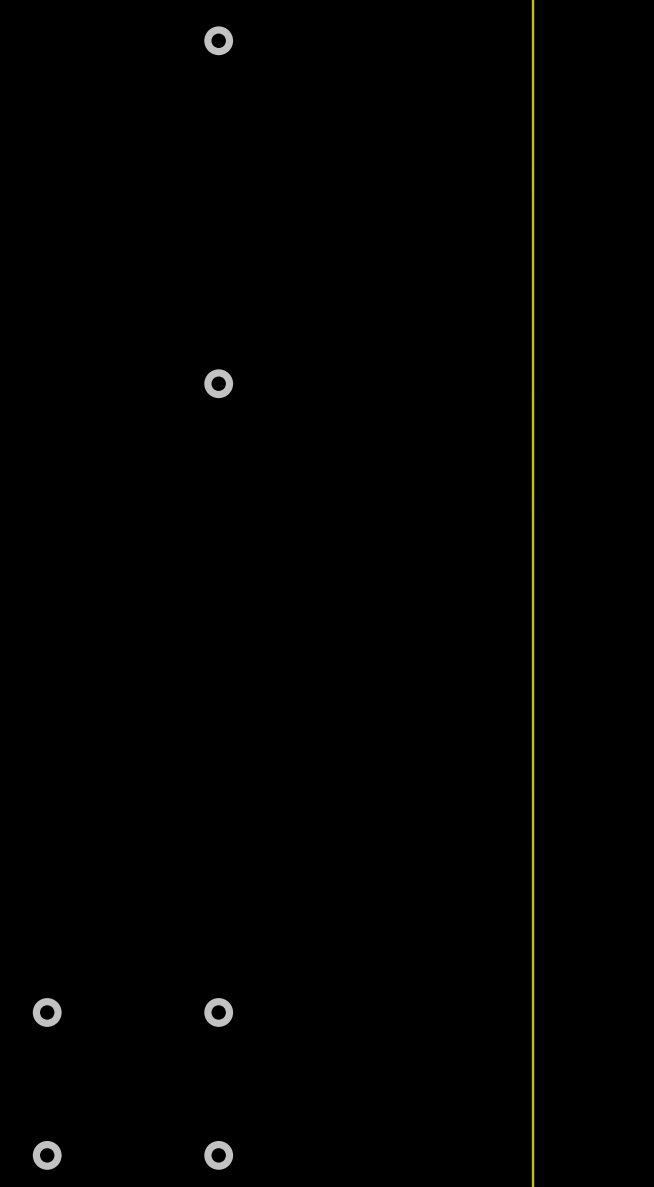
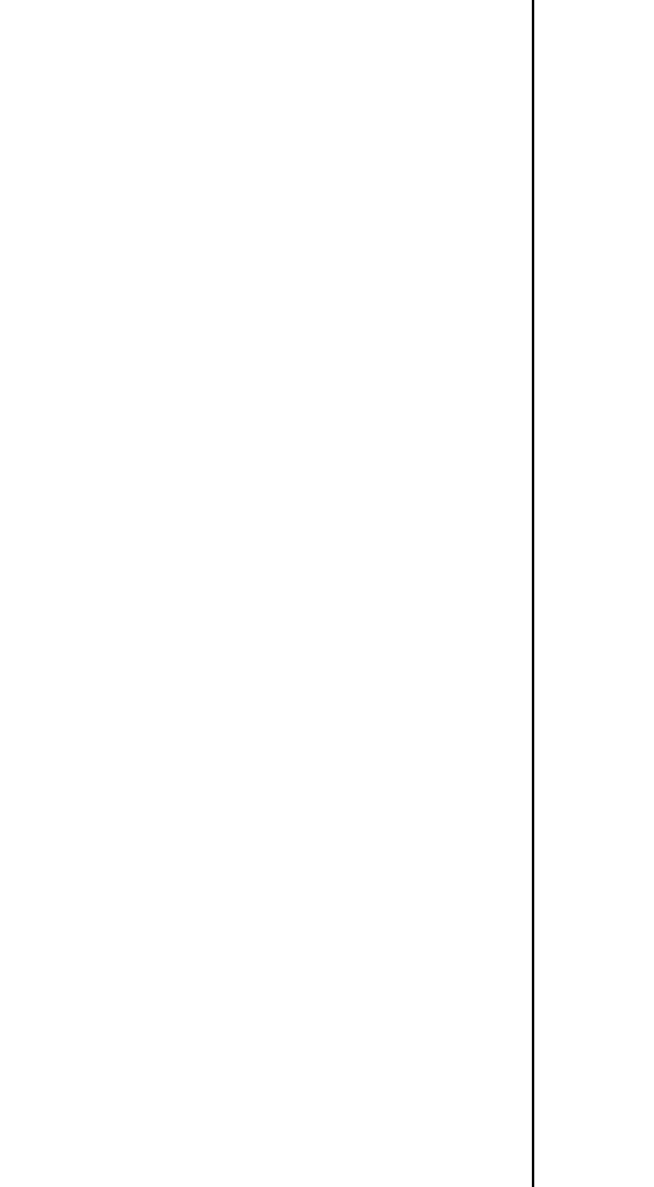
via: (218, 40) -> none
via: (218, 383) -> none
via: (47, 1012) -> none
via: (218, 1012) -> none
via: (47, 1155) -> none
via: (218, 1155) -> none

